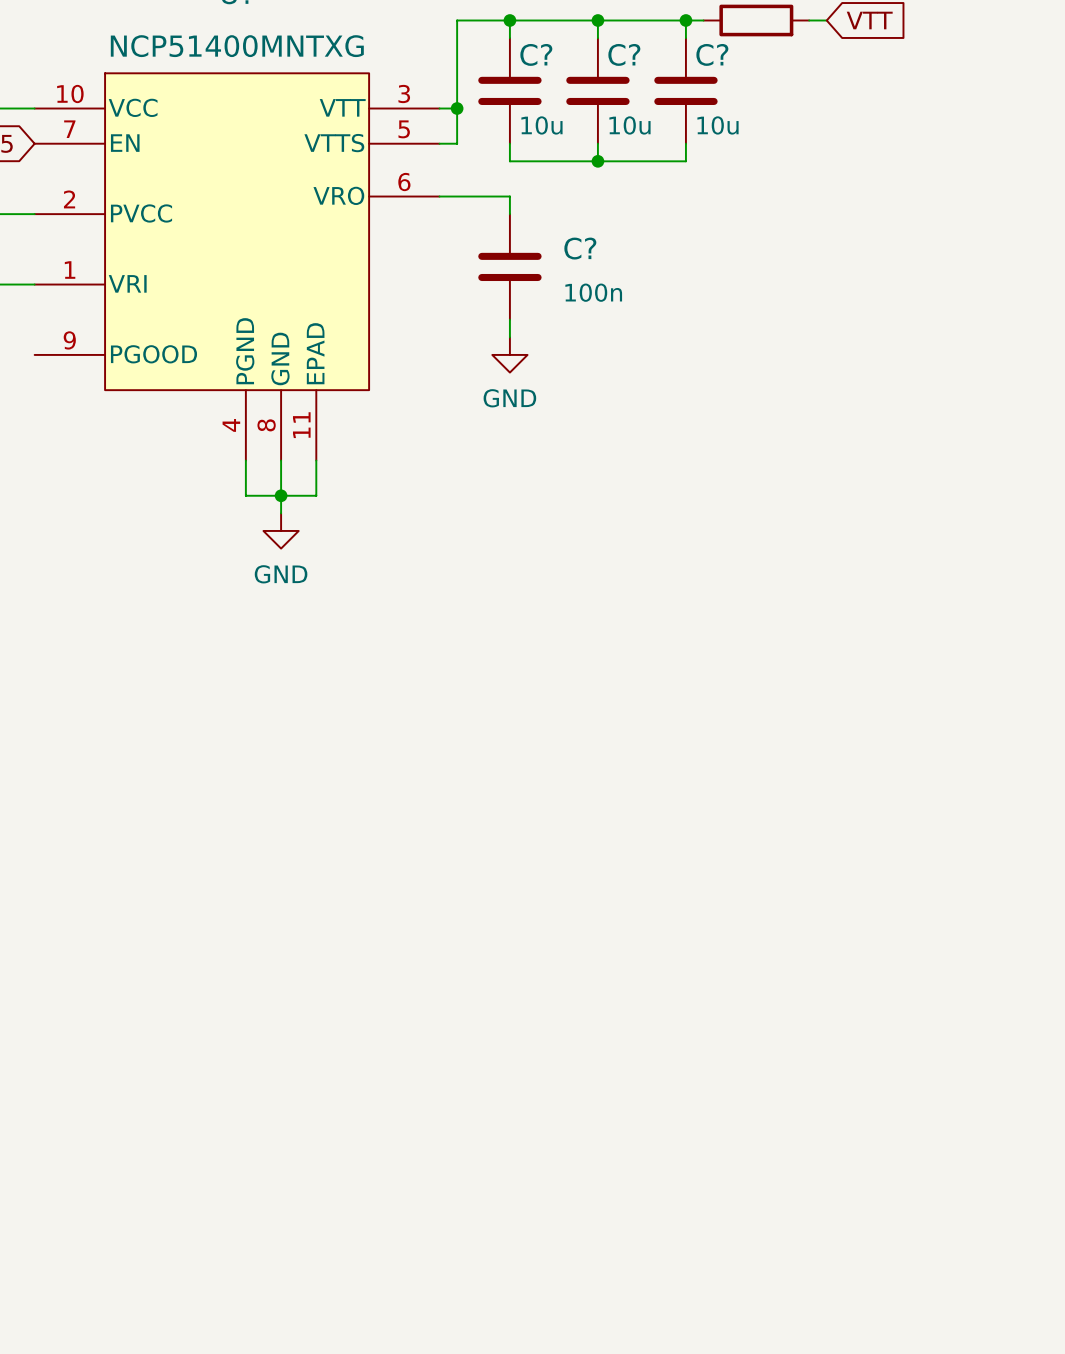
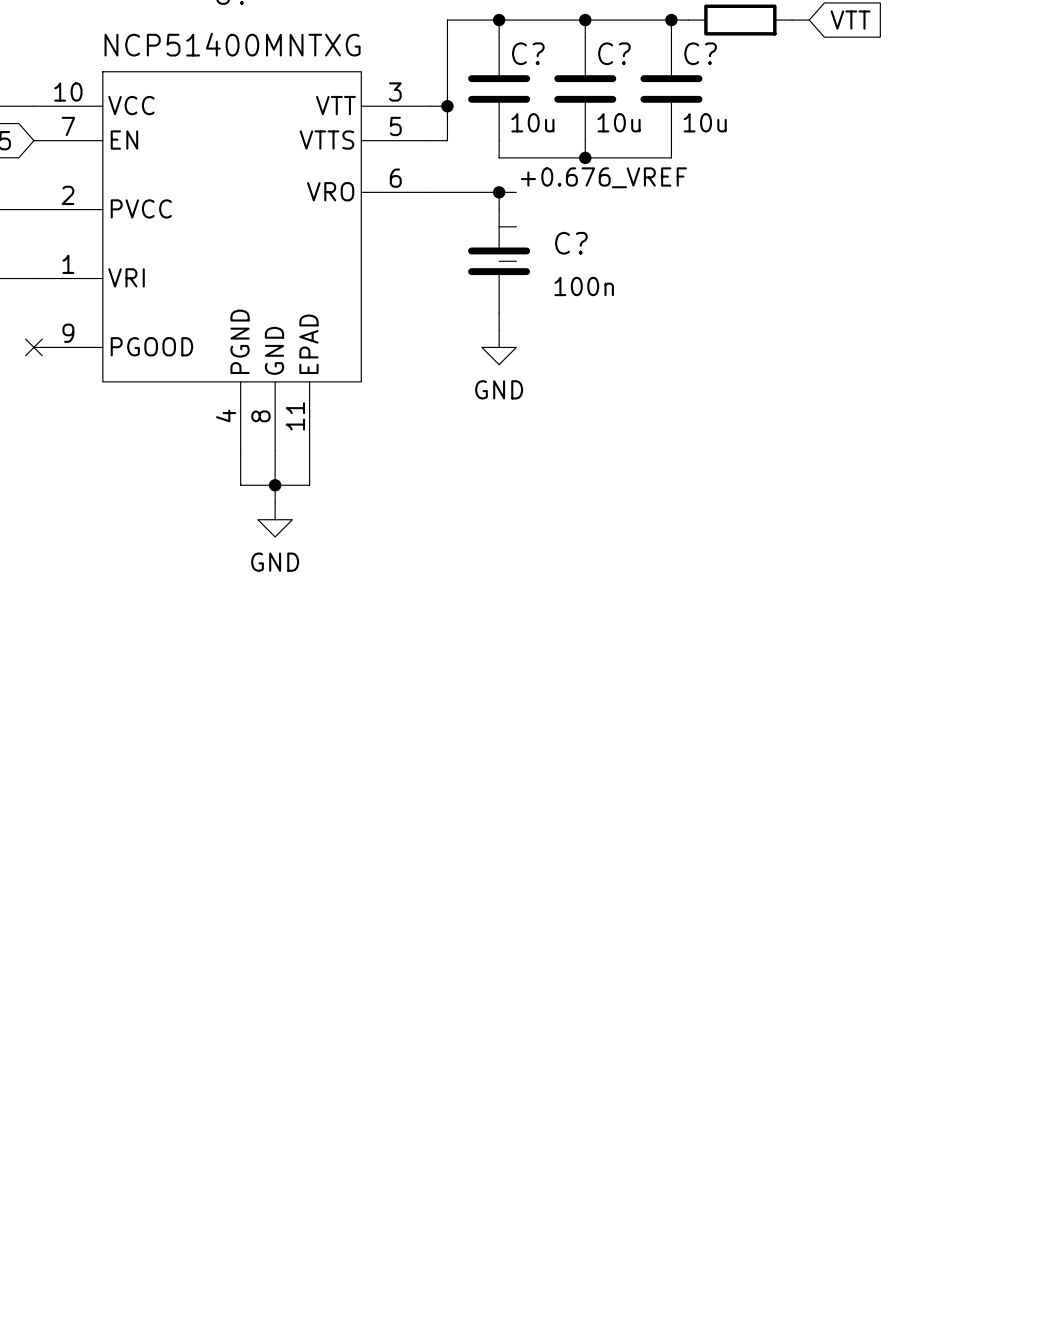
label: none -> +0.676_VREF (603, 177)
wire: none -> (499, 192) (516, 192)
junction: none -> (499, 192)
wire: none -> (499, 226) (516, 226)
wire: none -> (499, 261) (516, 261)
no-connect mark: none -> (33, 347)

